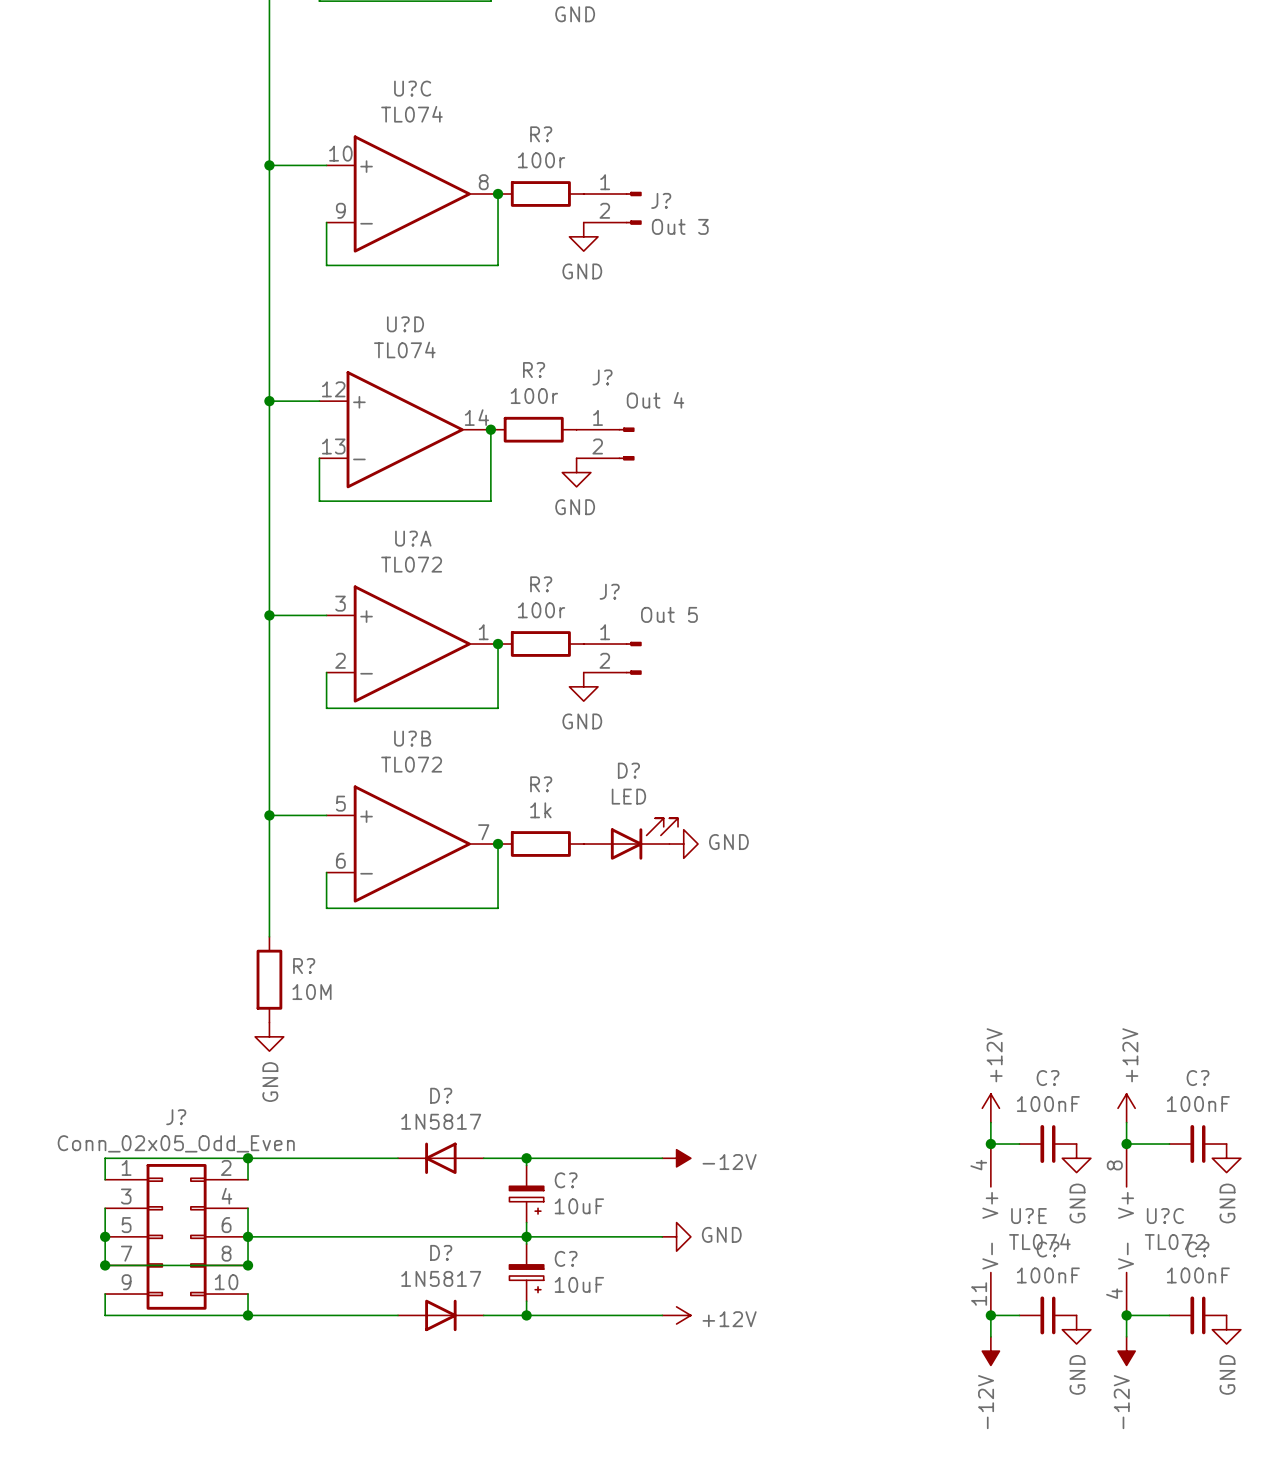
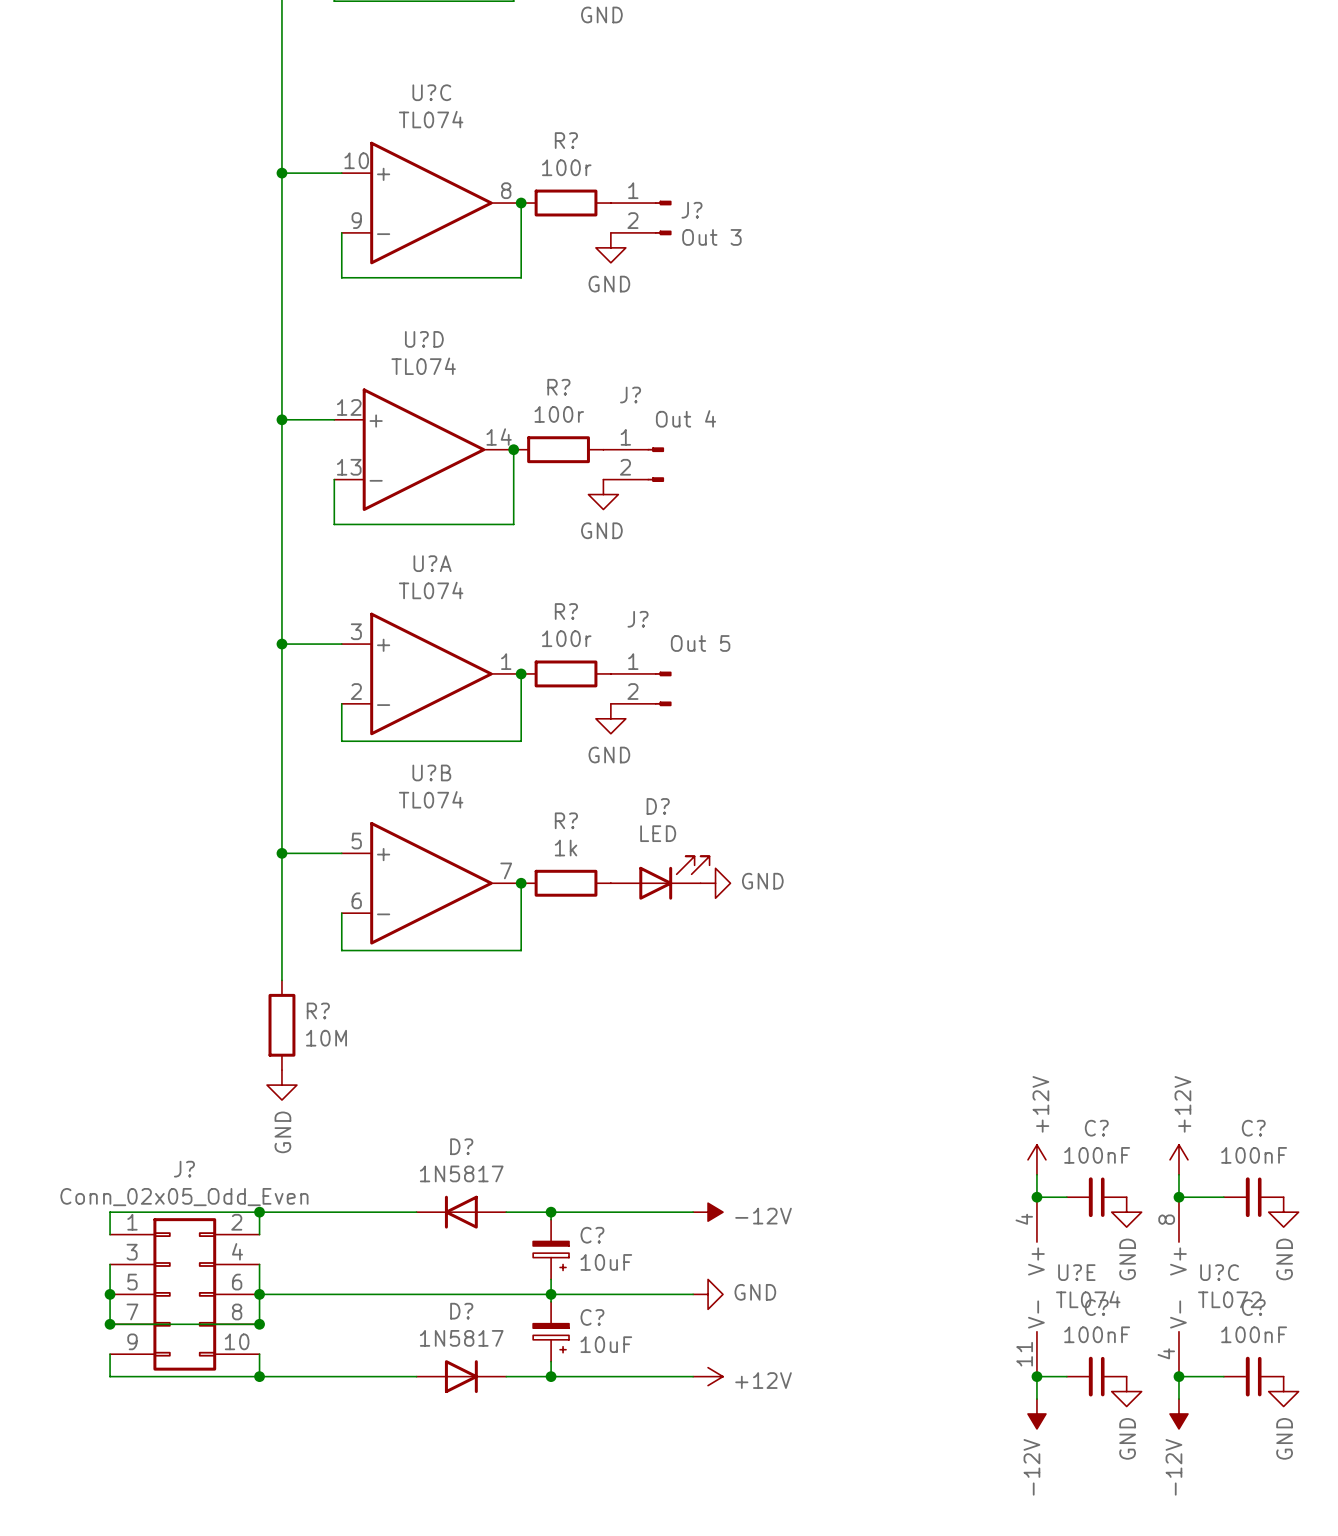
U?A value: TL072 (411, 564) -> TL074 (431, 590)
U?B value: TL072 (411, 764) -> TL074 (431, 799)

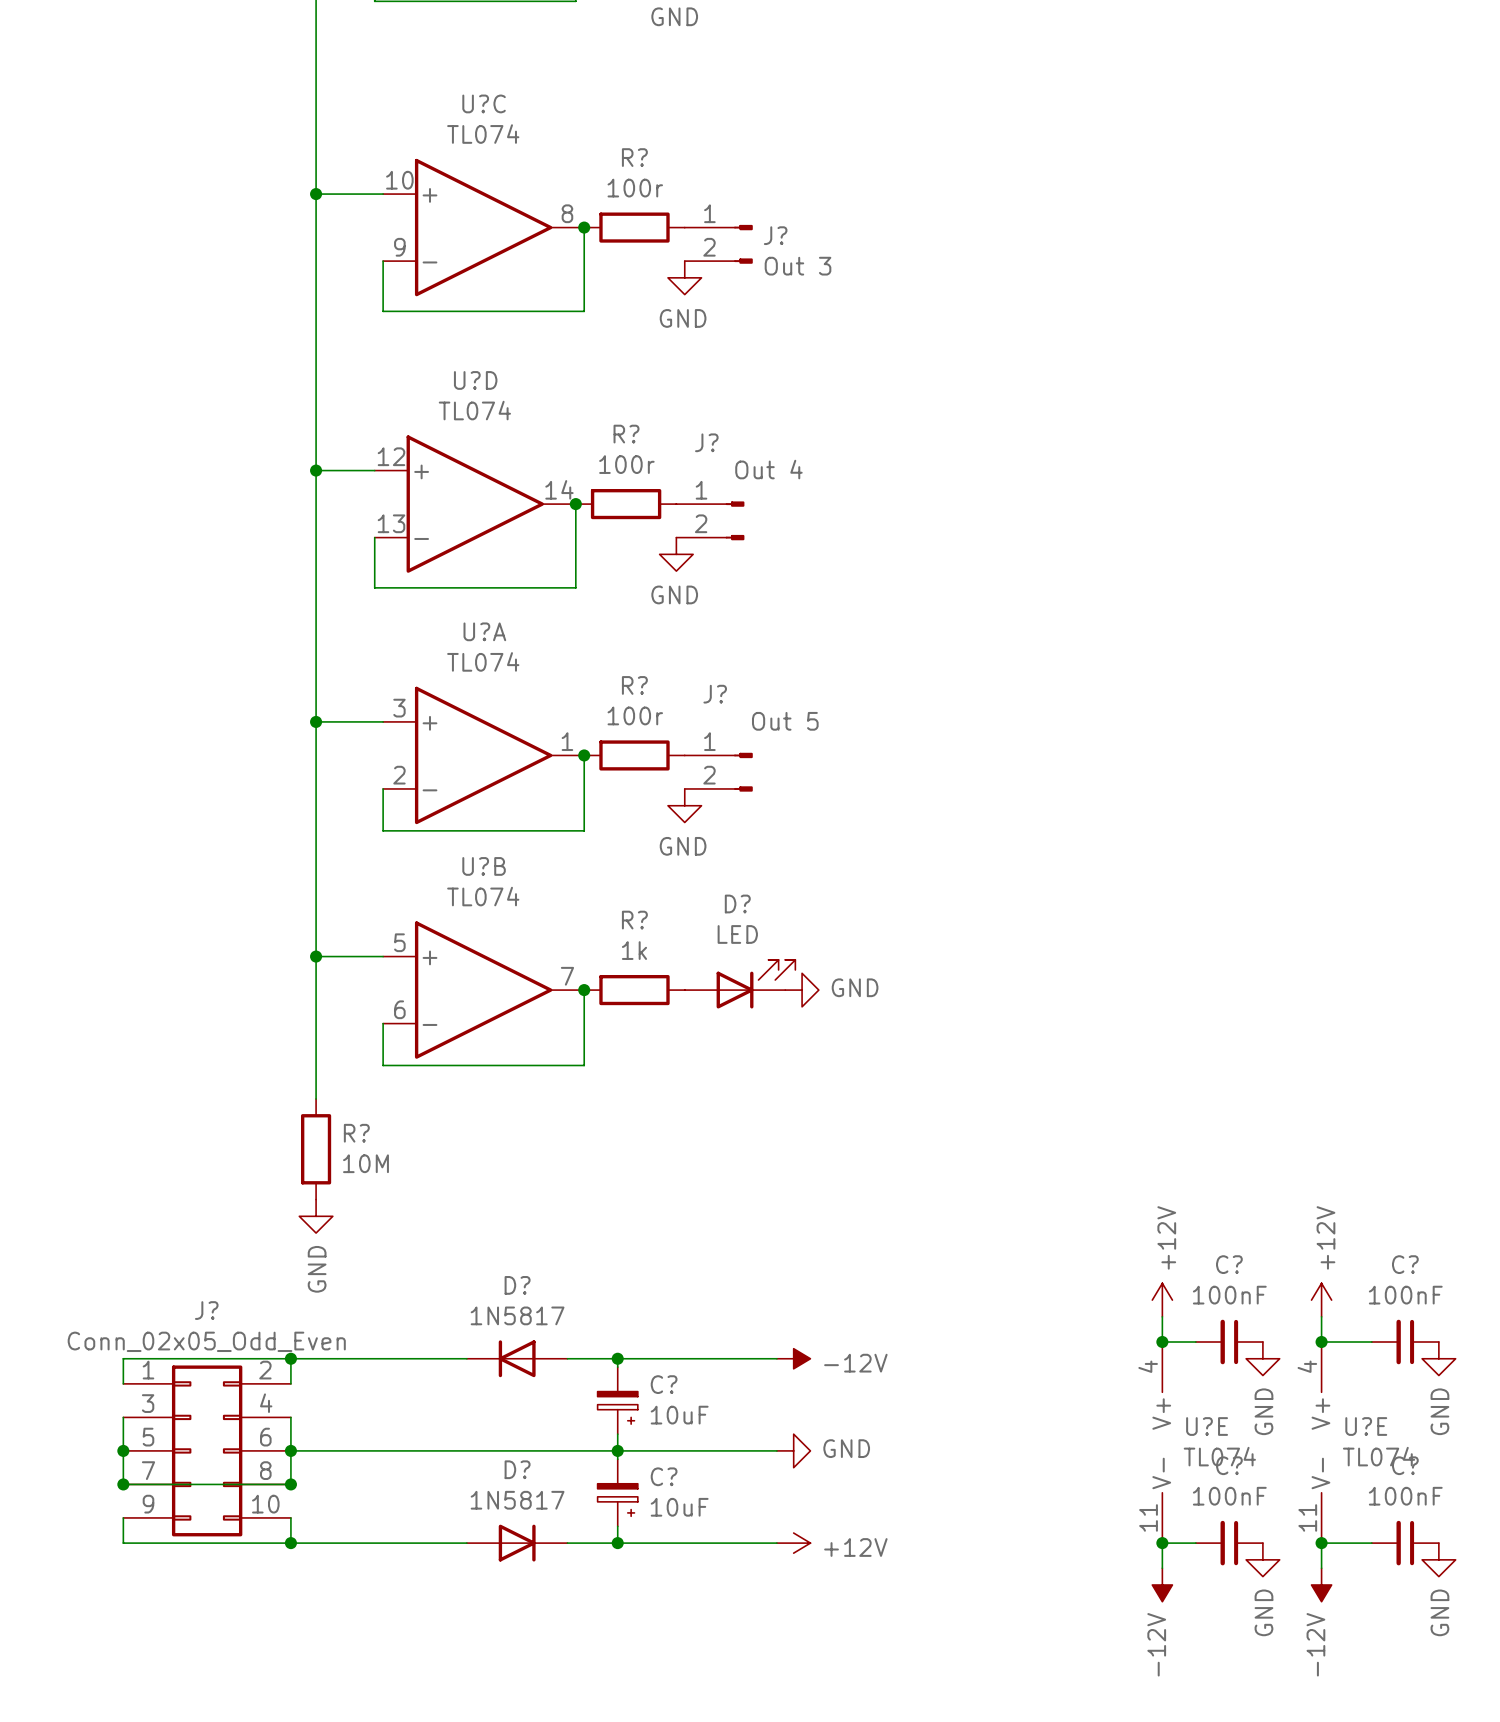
U?C pin number: 8 (1166, 1219) -> 4 (1307, 1366)
U?C name: U?C (1219, 1272) -> U?E (1366, 1426)
U?C value: TL072 (1229, 1299) -> TL074 (1379, 1456)
U?C pin number: 4 (1166, 1353) -> 11 (1307, 1517)

